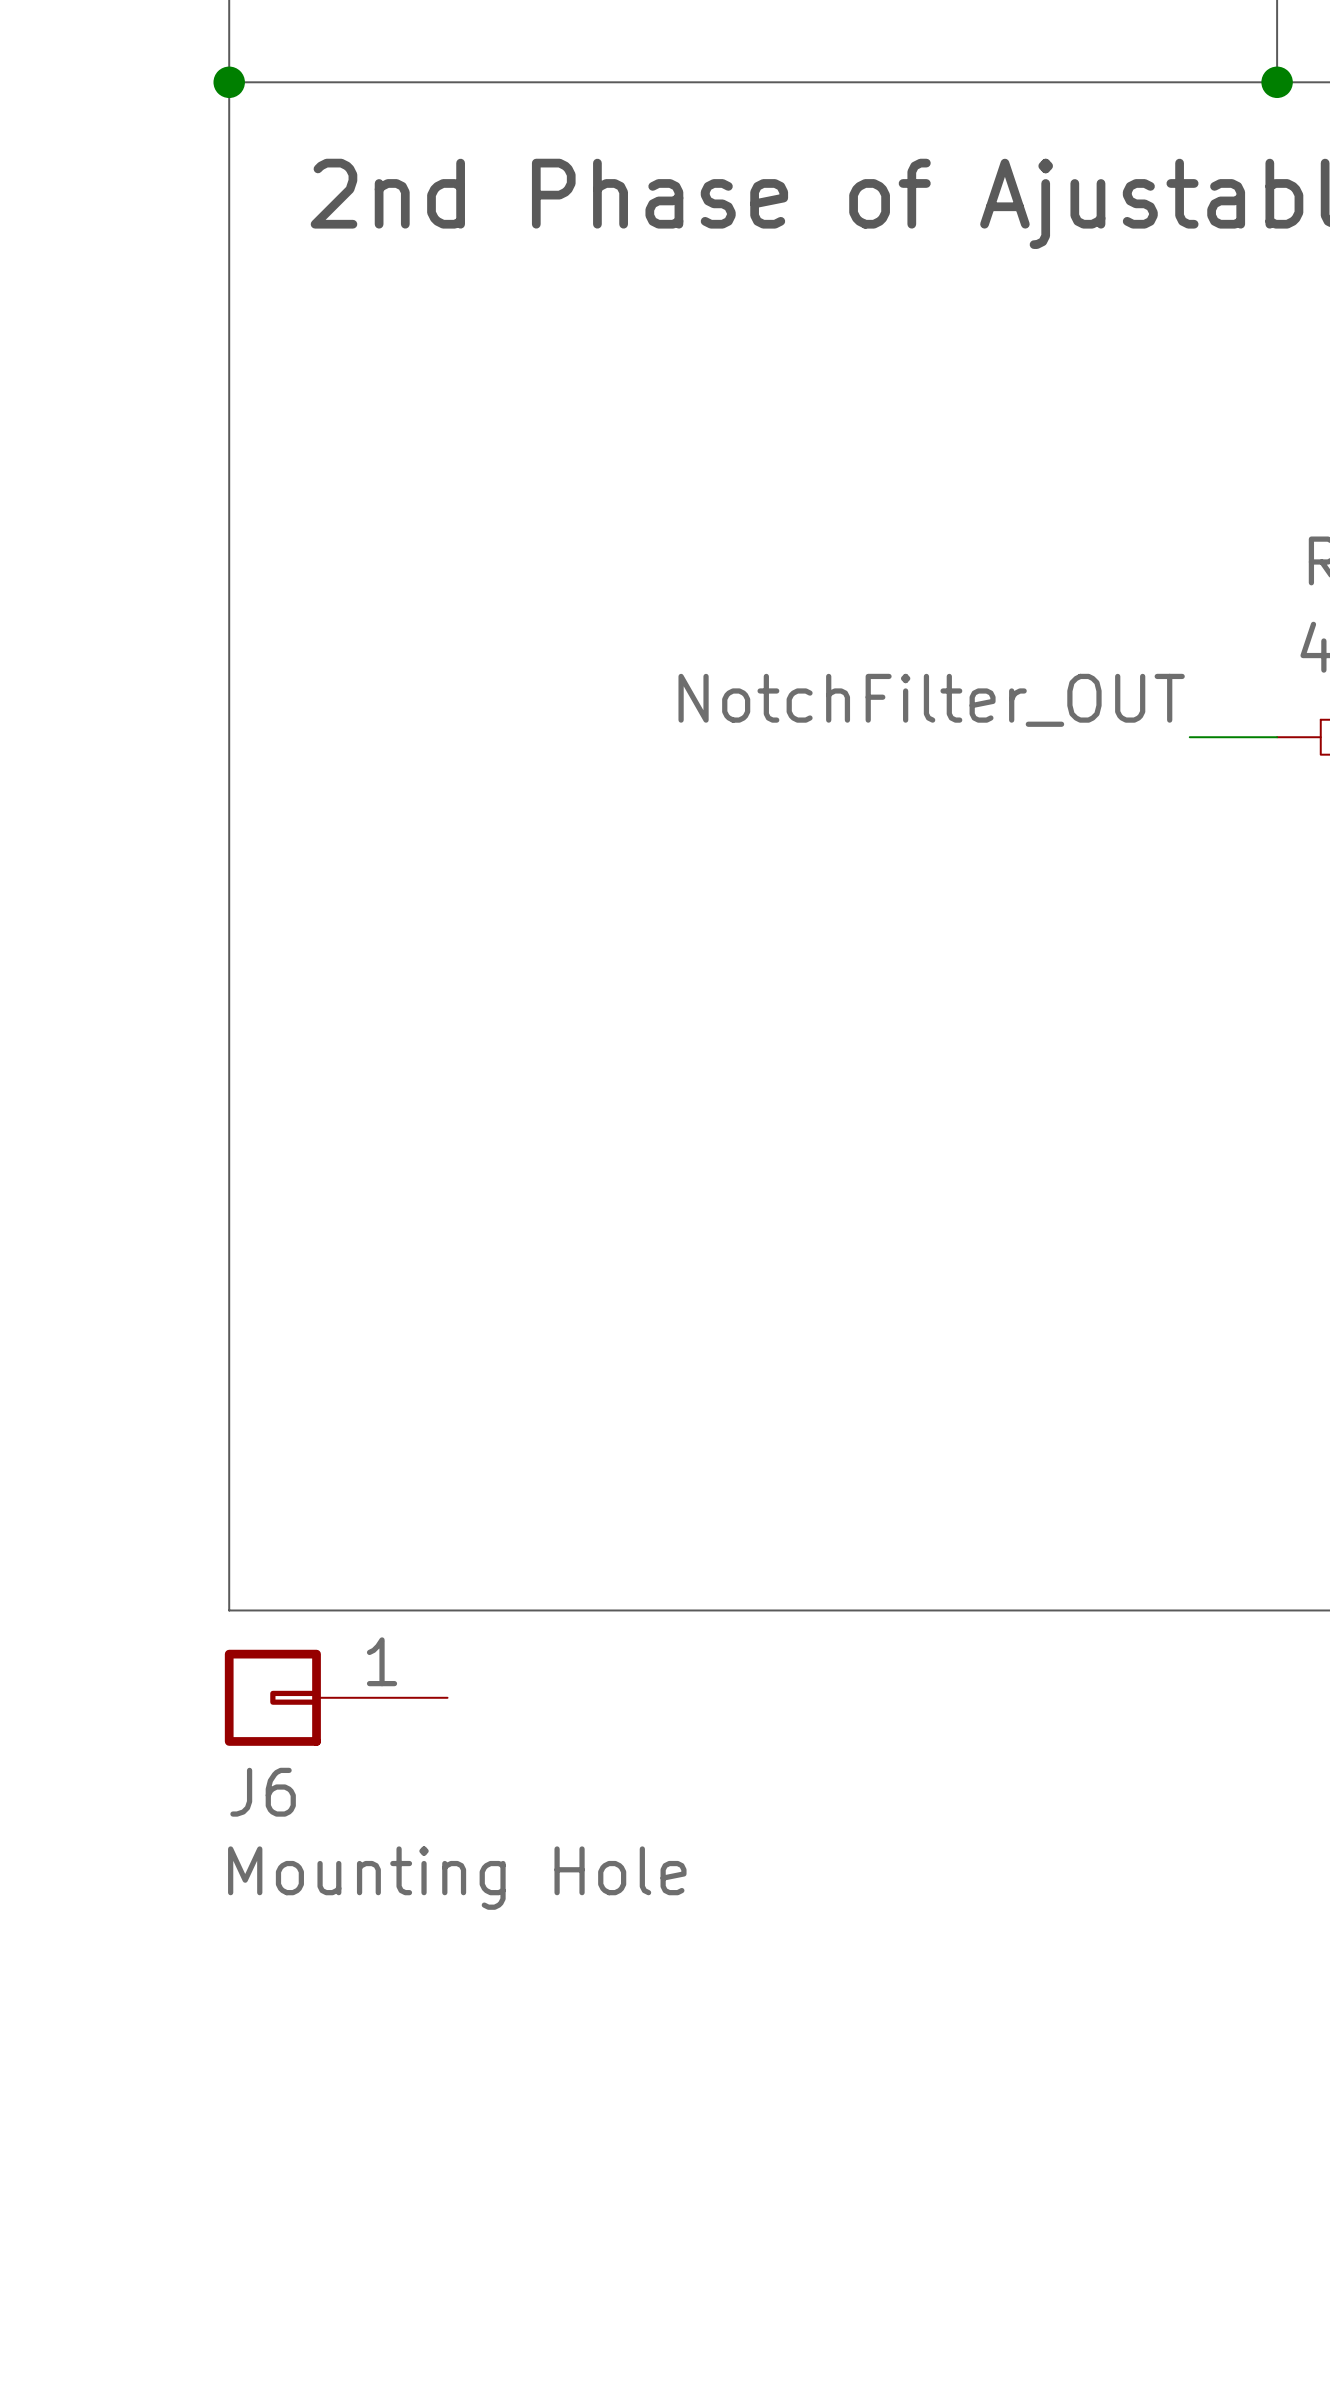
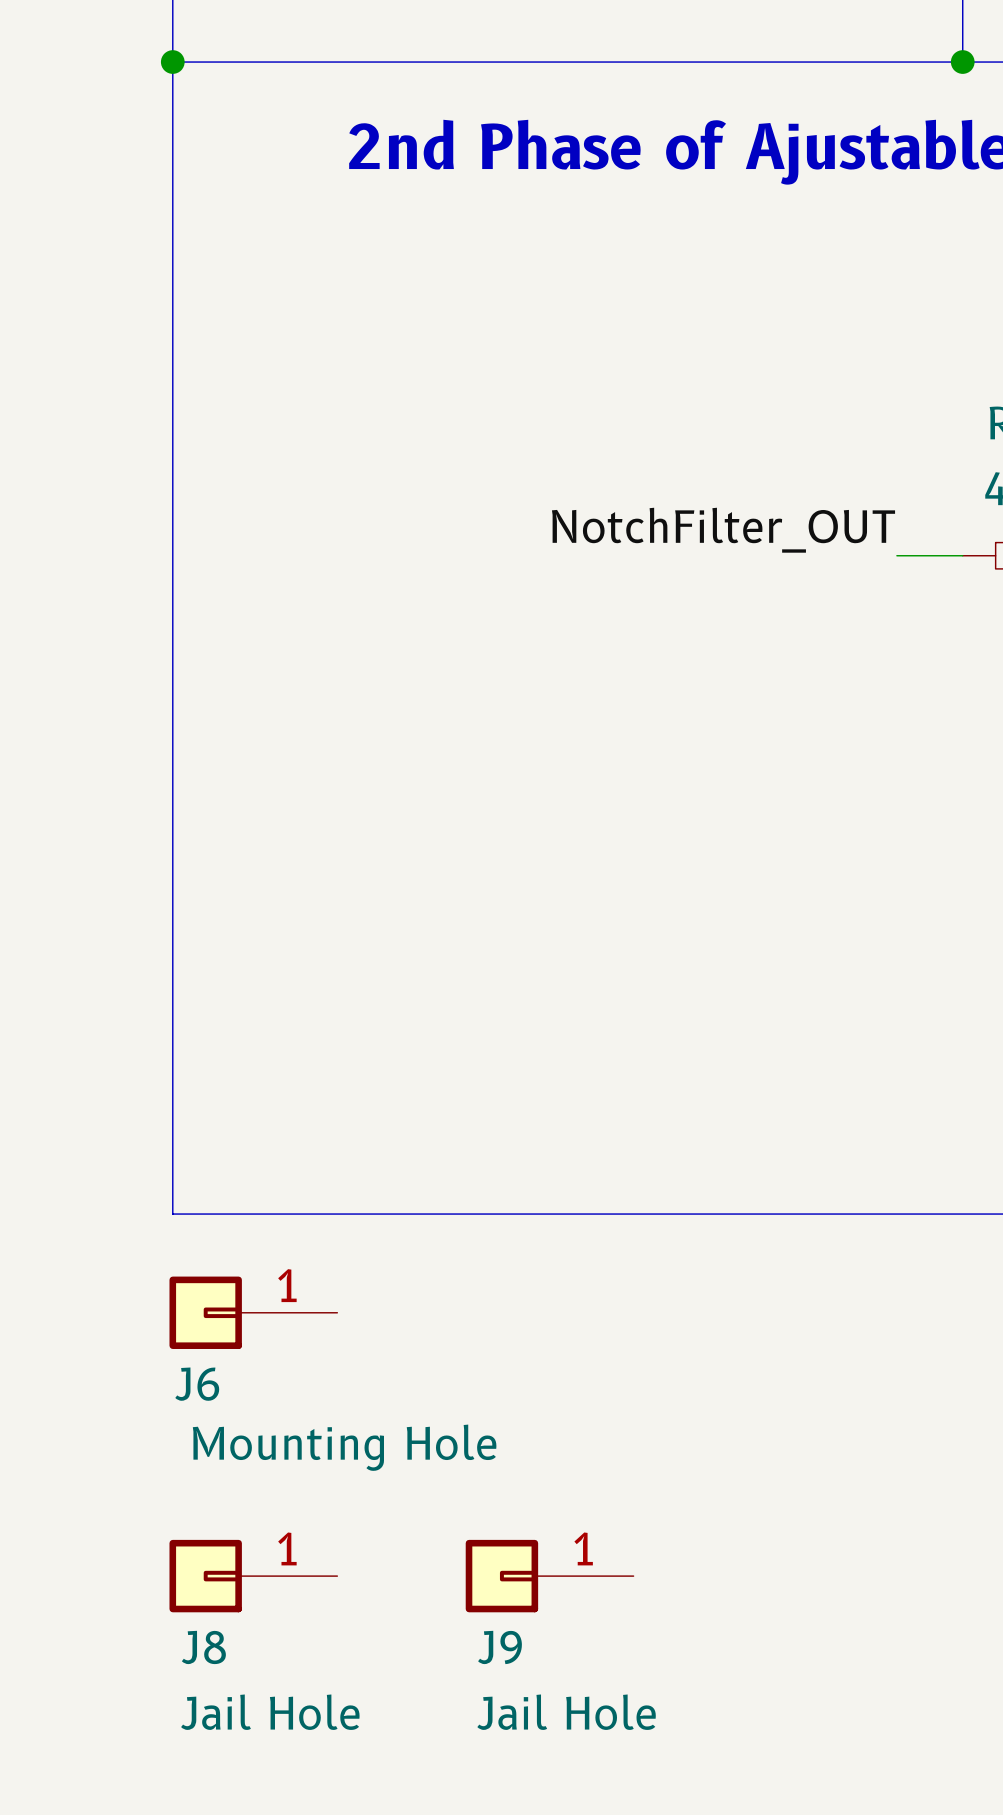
J6 position: (336, 1697) -> (253, 1312)
J8: none -> Jail Hole (253, 1576)
J9: none -> Jail Hole (549, 1576)

